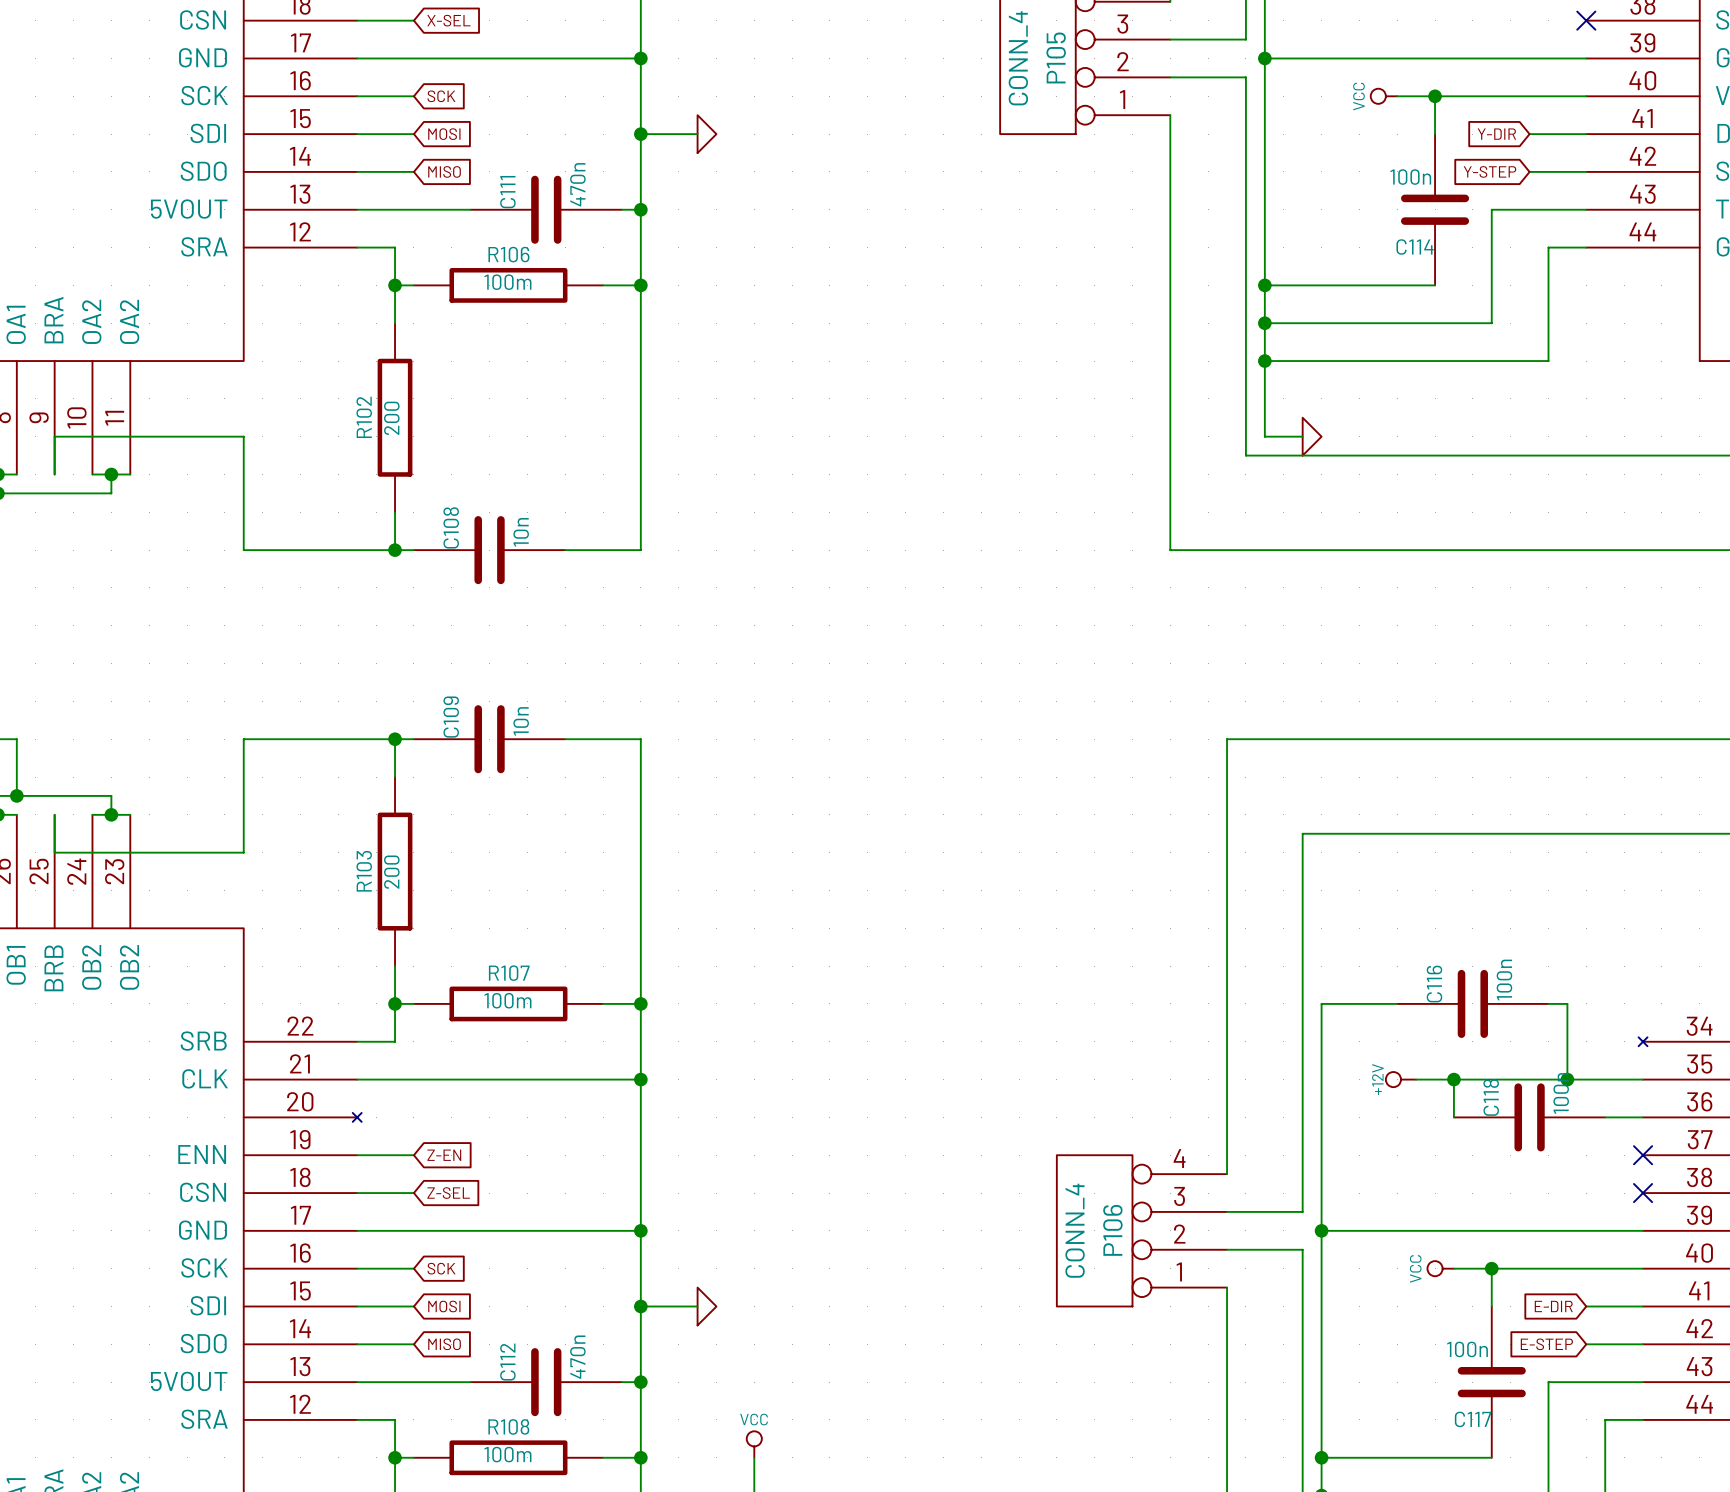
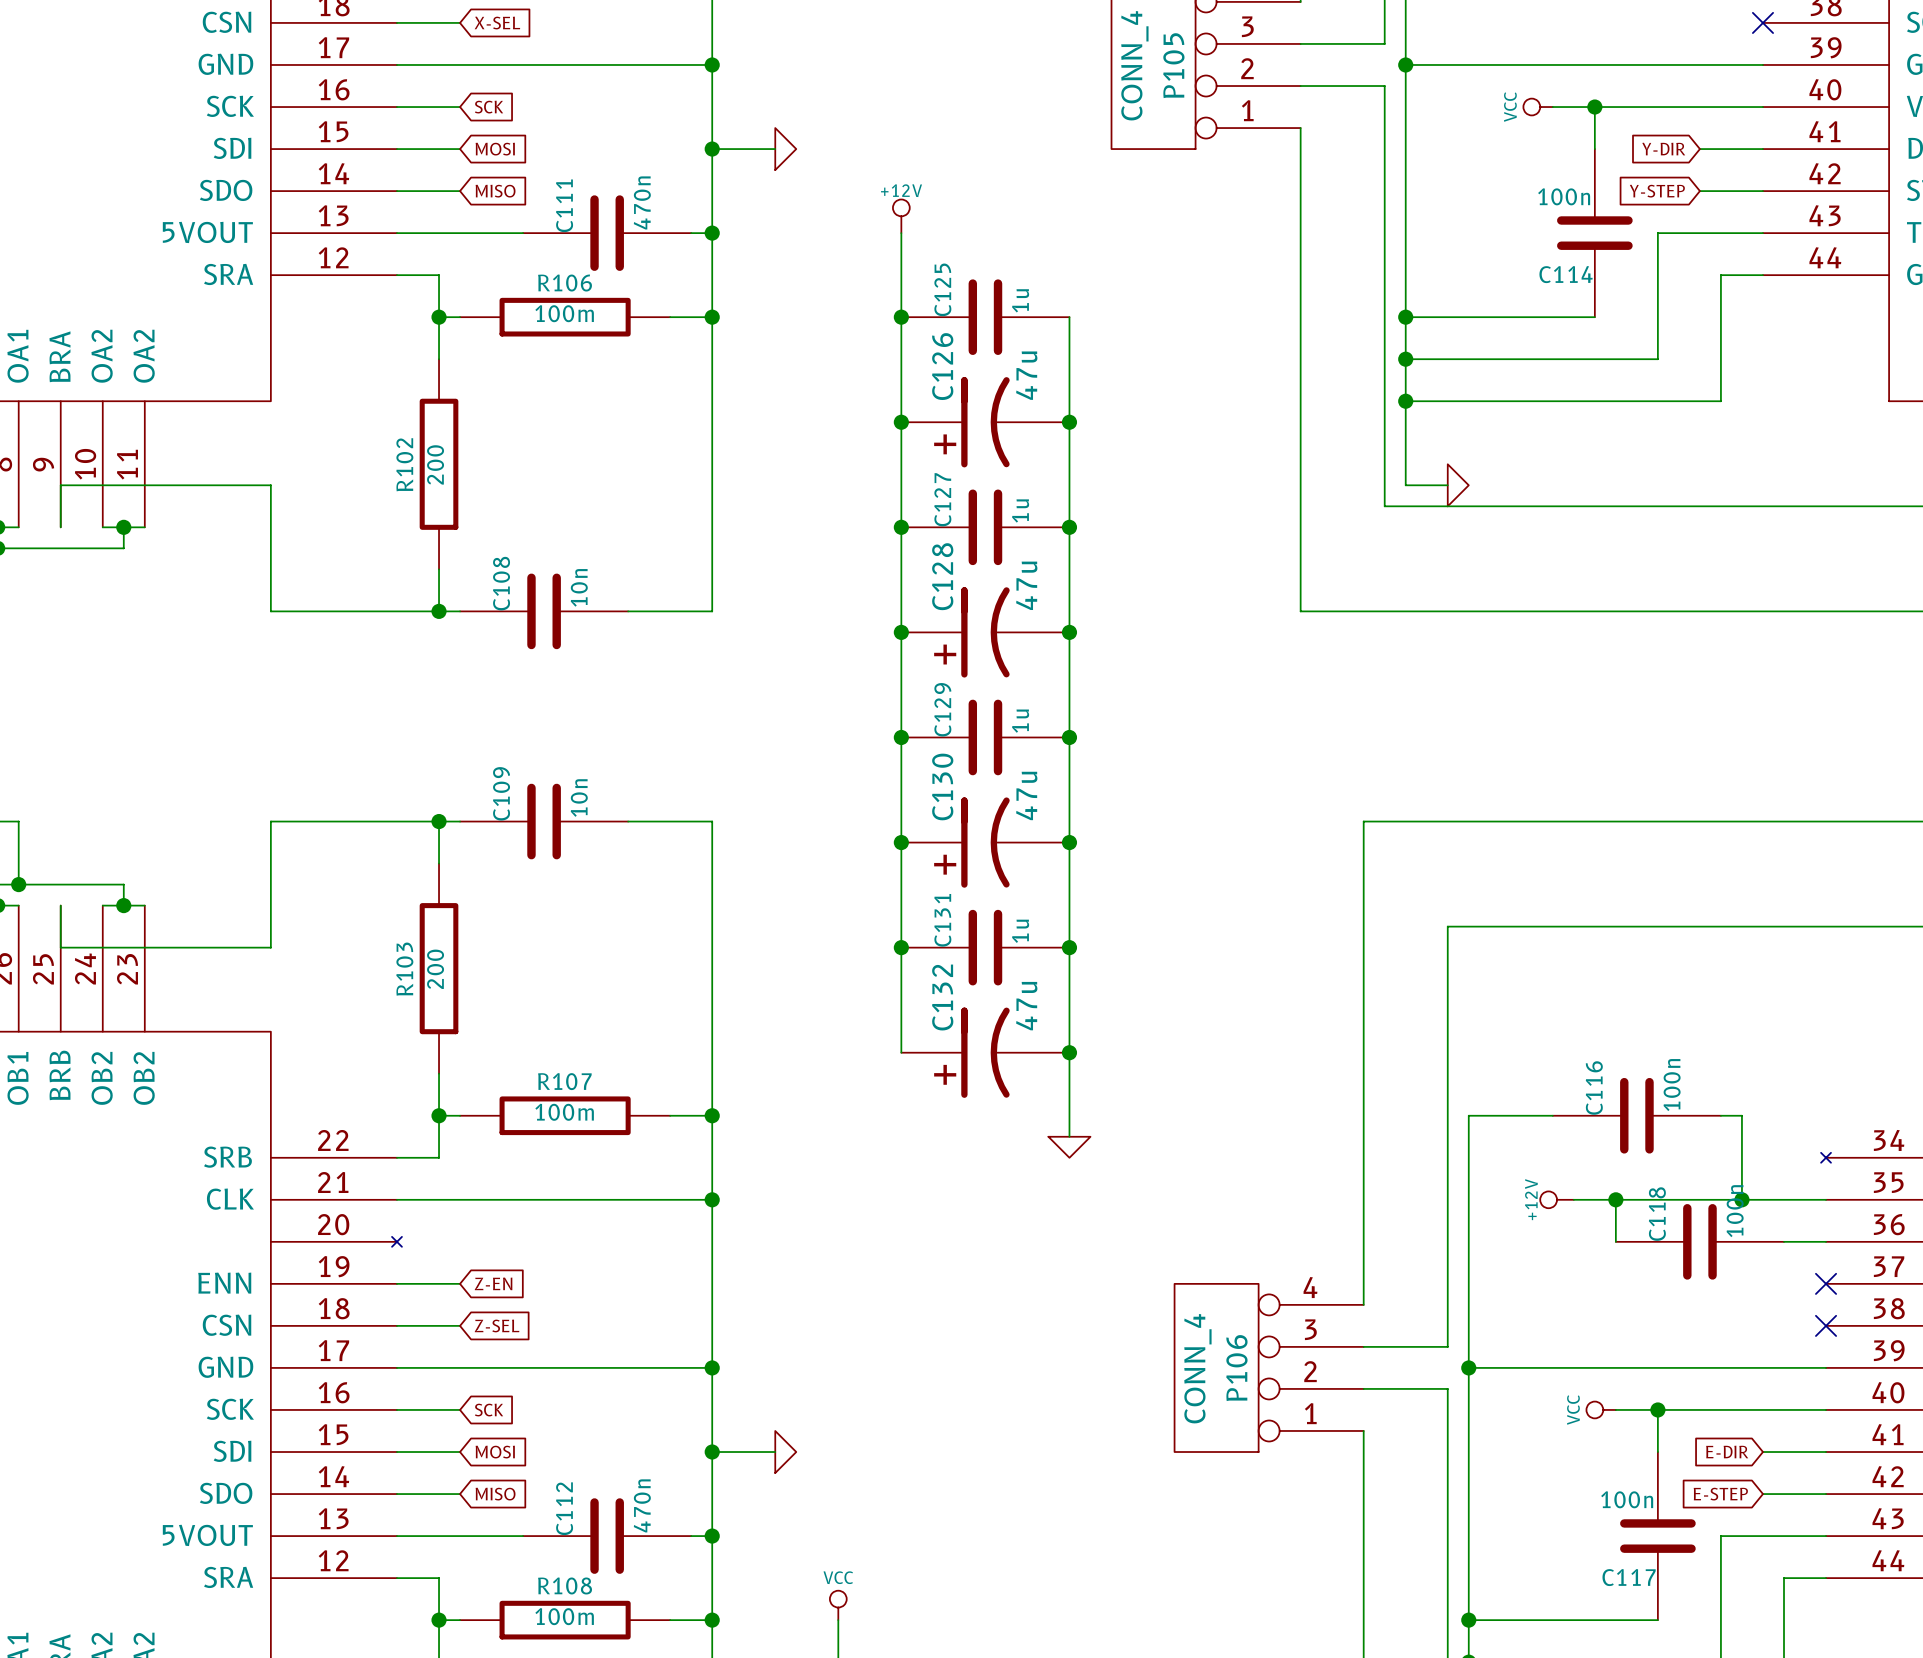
power symbol: none -> +12V (901, 216)
wire: none -> (901, 233) (901, 1052)
junction: none -> (901, 317)
C125: none -> 1u (985, 317)
wire: none -> (1069, 317) (1069, 1136)
junction: none -> (901, 422)
C126: none -> 47u (985, 422)
junction: none -> (1069, 422)
junction: none -> (901, 527)
C127: none -> 1u (985, 527)
junction: none -> (1069, 527)
junction: none -> (901, 632)
C128: none -> 47u (985, 632)
junction: none -> (1069, 632)
junction: none -> (901, 737)
C129: none -> 1u (985, 737)
junction: none -> (1069, 737)
junction: none -> (901, 842)
C130: none -> 47u (985, 842)
junction: none -> (1069, 842)
junction: none -> (901, 947)
C131: none -> 1u (985, 947)
junction: none -> (1069, 947)
C132: none -> 47u (985, 1052)
junction: none -> (1069, 1052)
power symbol: none -> (1069, 1147)

